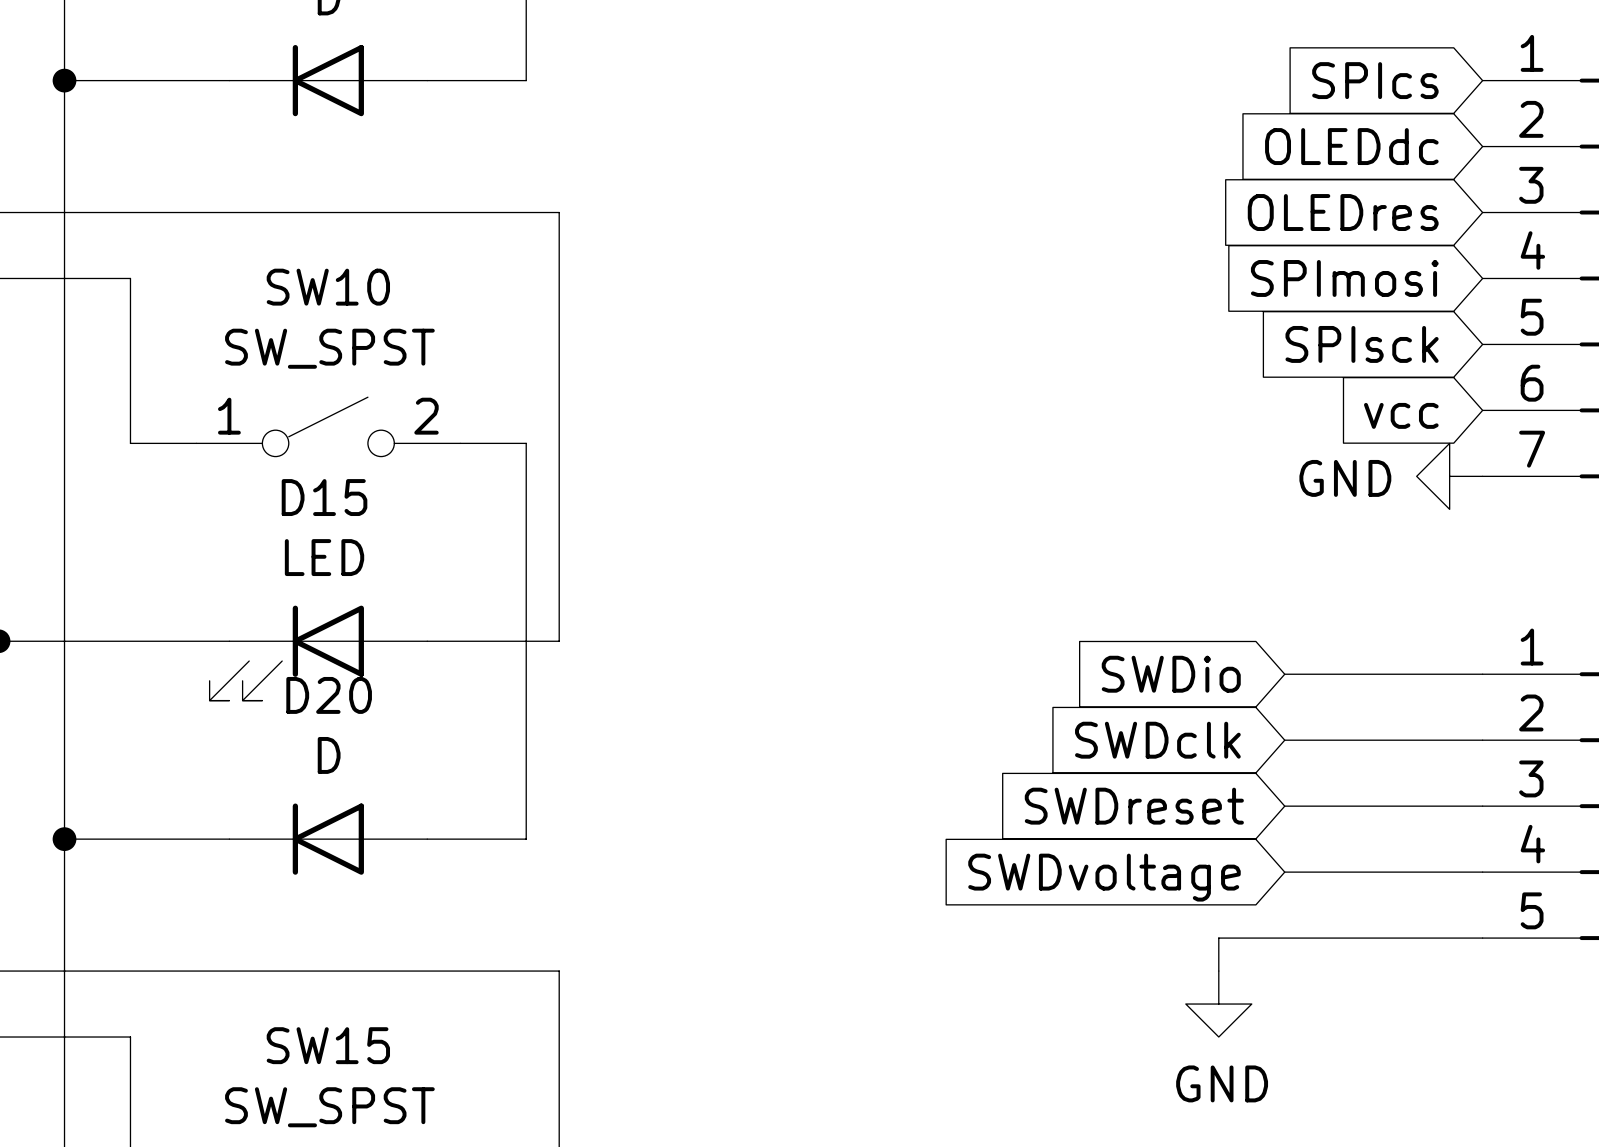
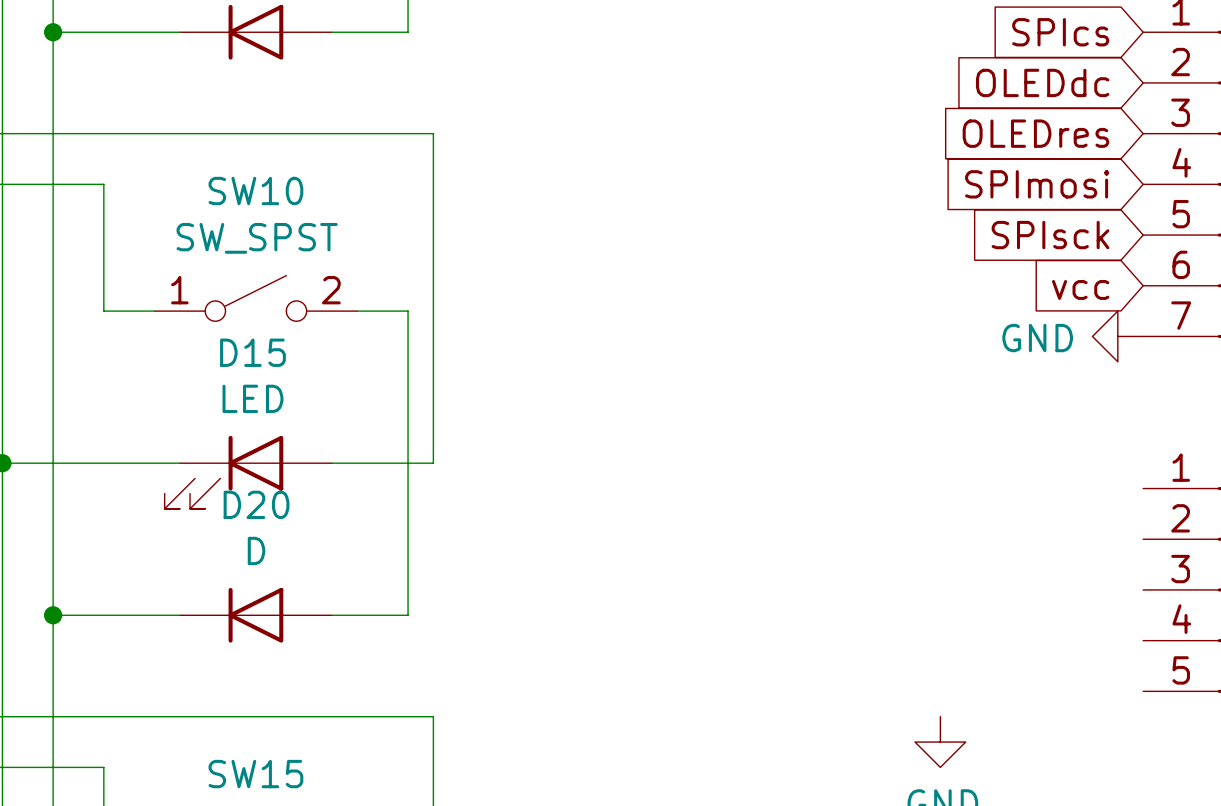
global label: SWDio (1171, 674) -> none
wire: (1284, 674) (1482, 674) -> none
global label: SWDclk (1157, 740) -> none
wire: (1284, 740) (1482, 740) -> none
global label: SWDreset (1134, 806) -> none
wire: (1284, 806) (1482, 806) -> none
wire: (1284, 872) (1482, 872) -> none
global label: SWDvoltage (1104, 877) -> none
wire: (1482, 938) (1218, 938) (1218, 971) -> none

